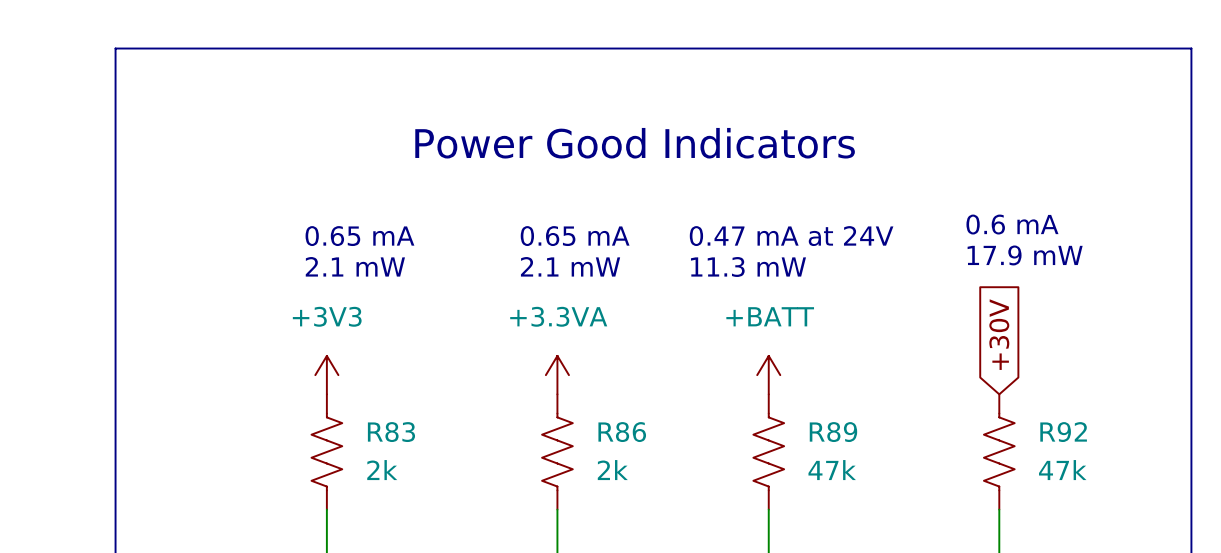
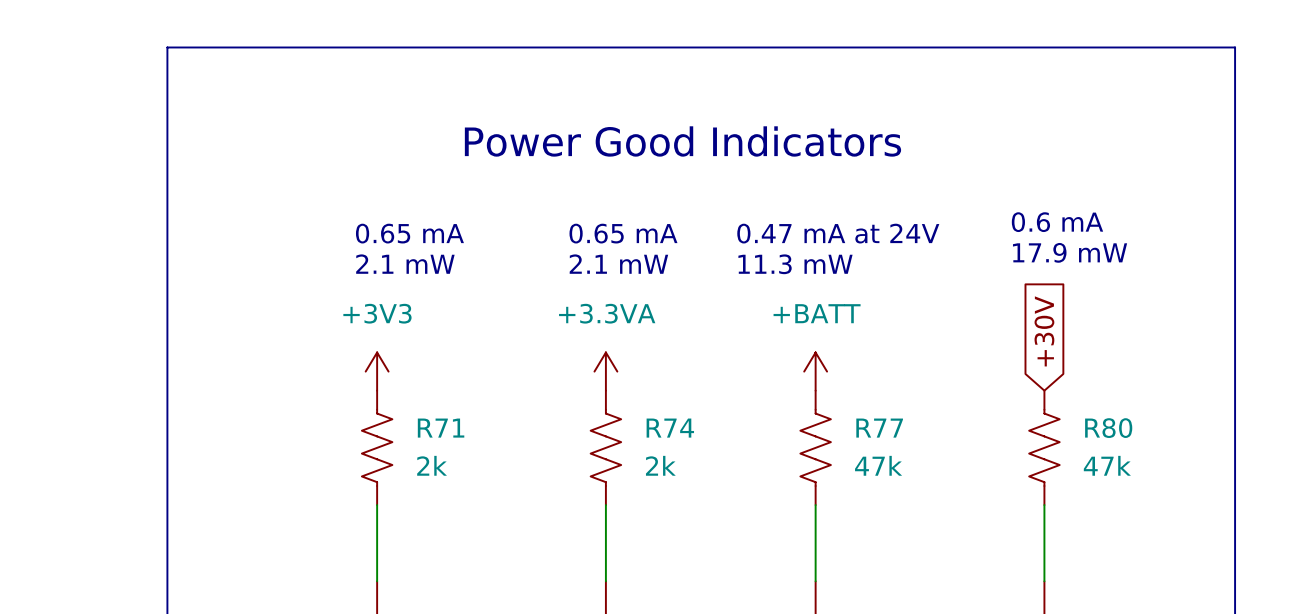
R83 name: R83 (391, 432) -> R71 (441, 428)
R86 name: R86 (622, 432) -> R74 (670, 428)
R89 name: R89 (833, 432) -> R77 (879, 428)
R92 name: R92 (1063, 432) -> R80 (1108, 428)

